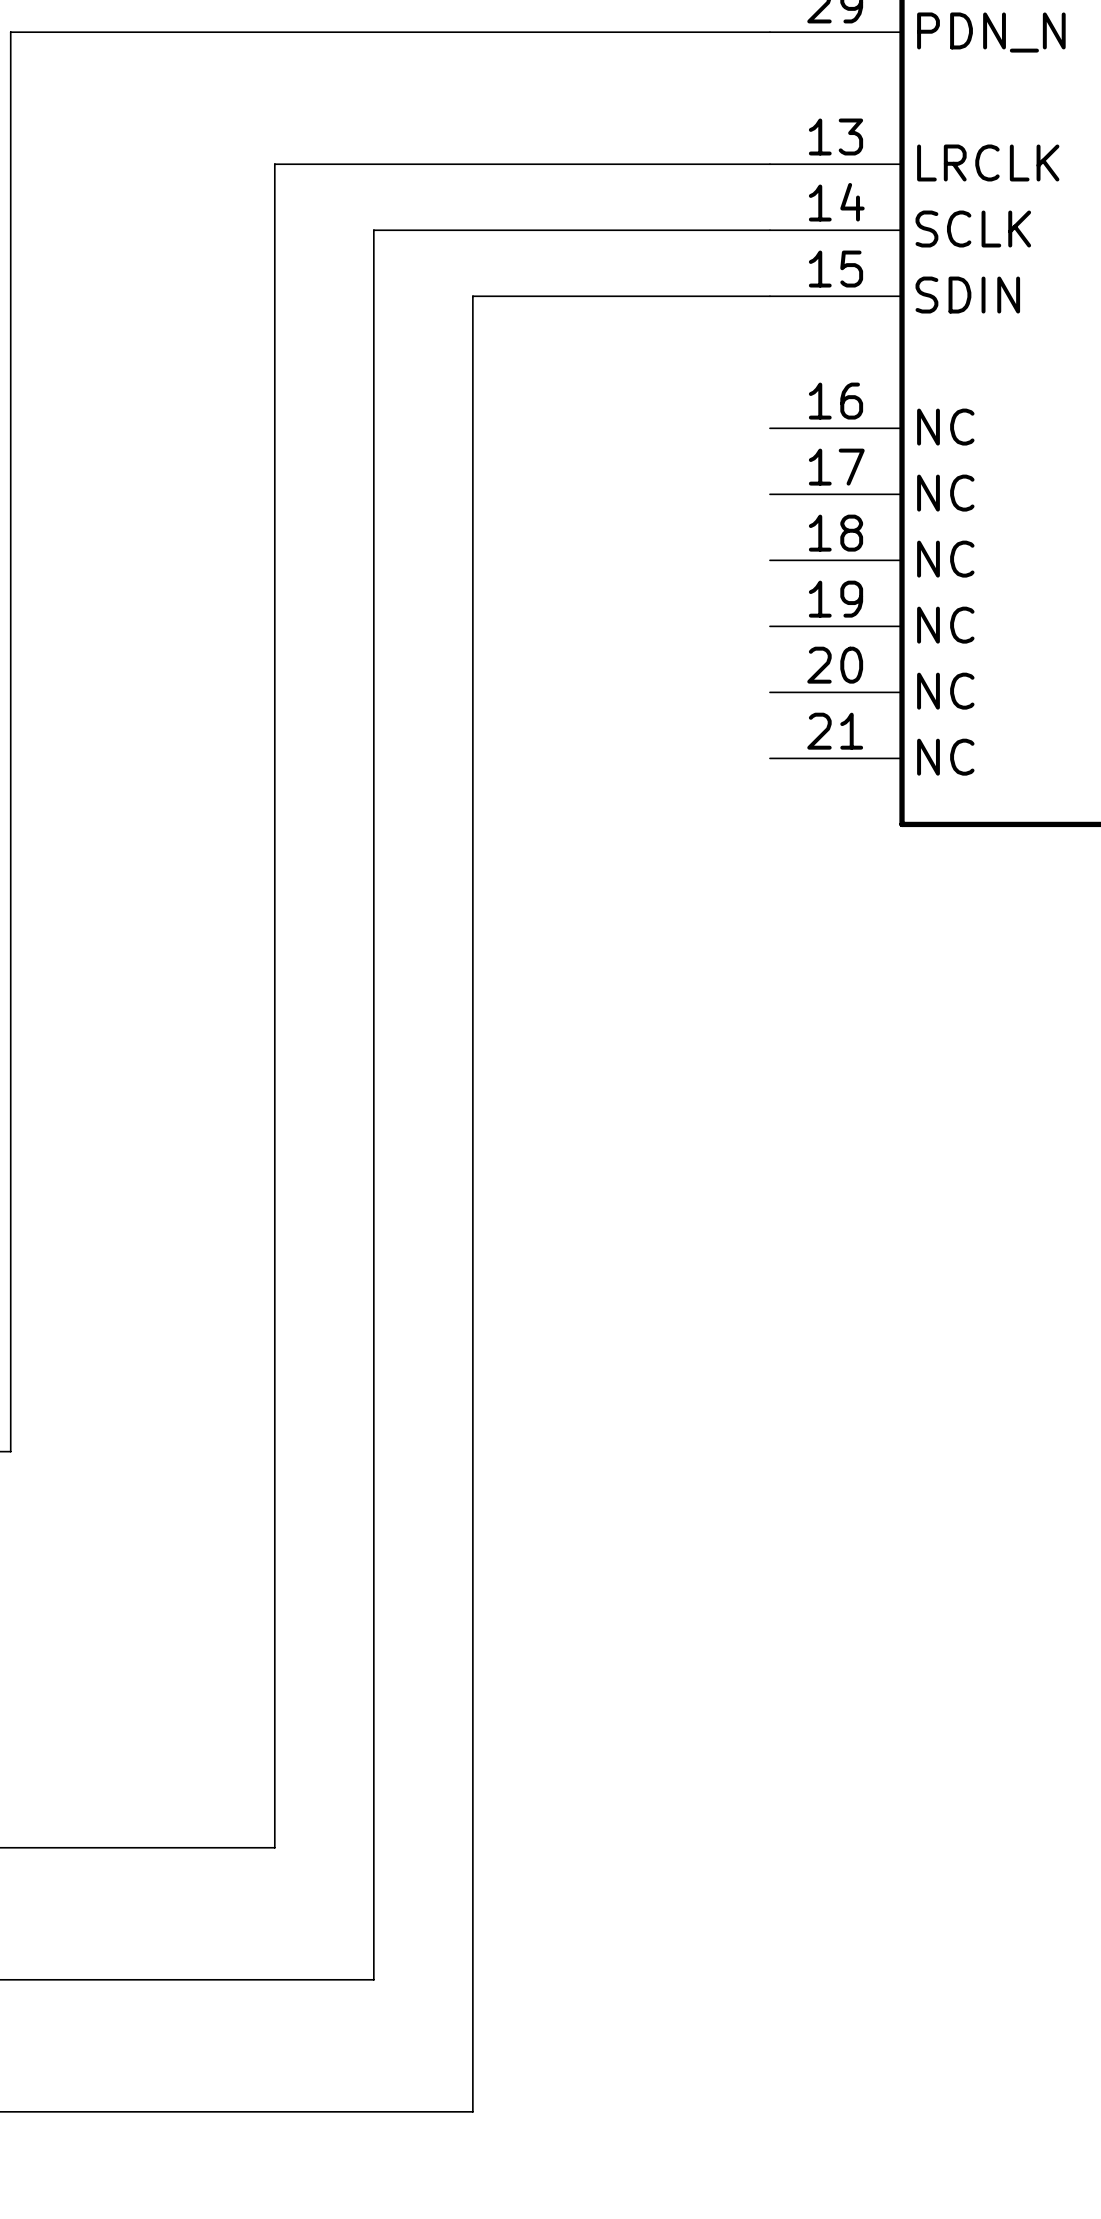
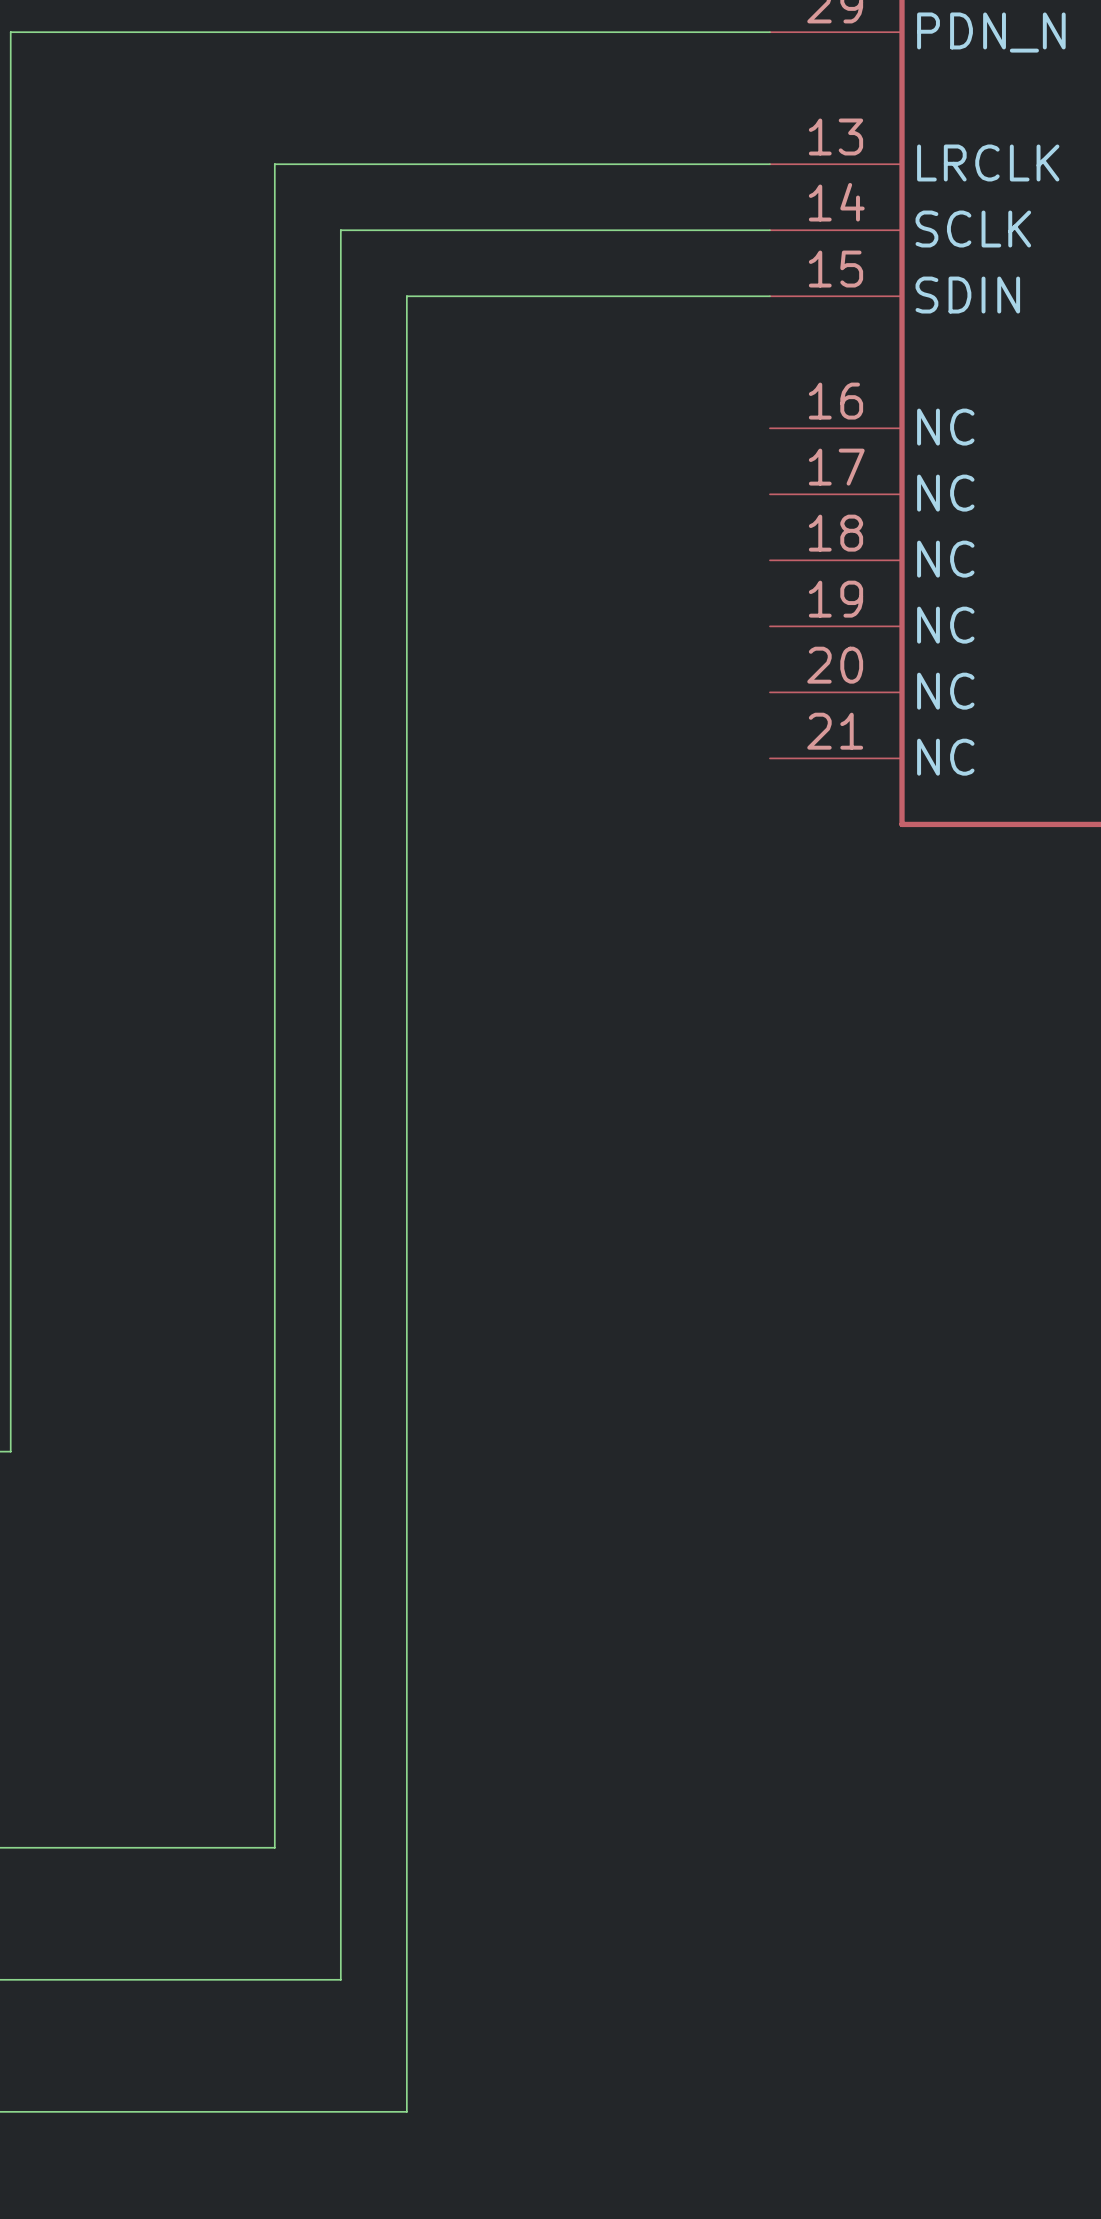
wire: (373, 230) (373, 1979) (340, 1979) -> (373, 230) (340, 230) (340, 1979)
wire: (472, 296) (472, 2111) (406, 2111) -> (472, 296) (406, 296) (406, 2111)

